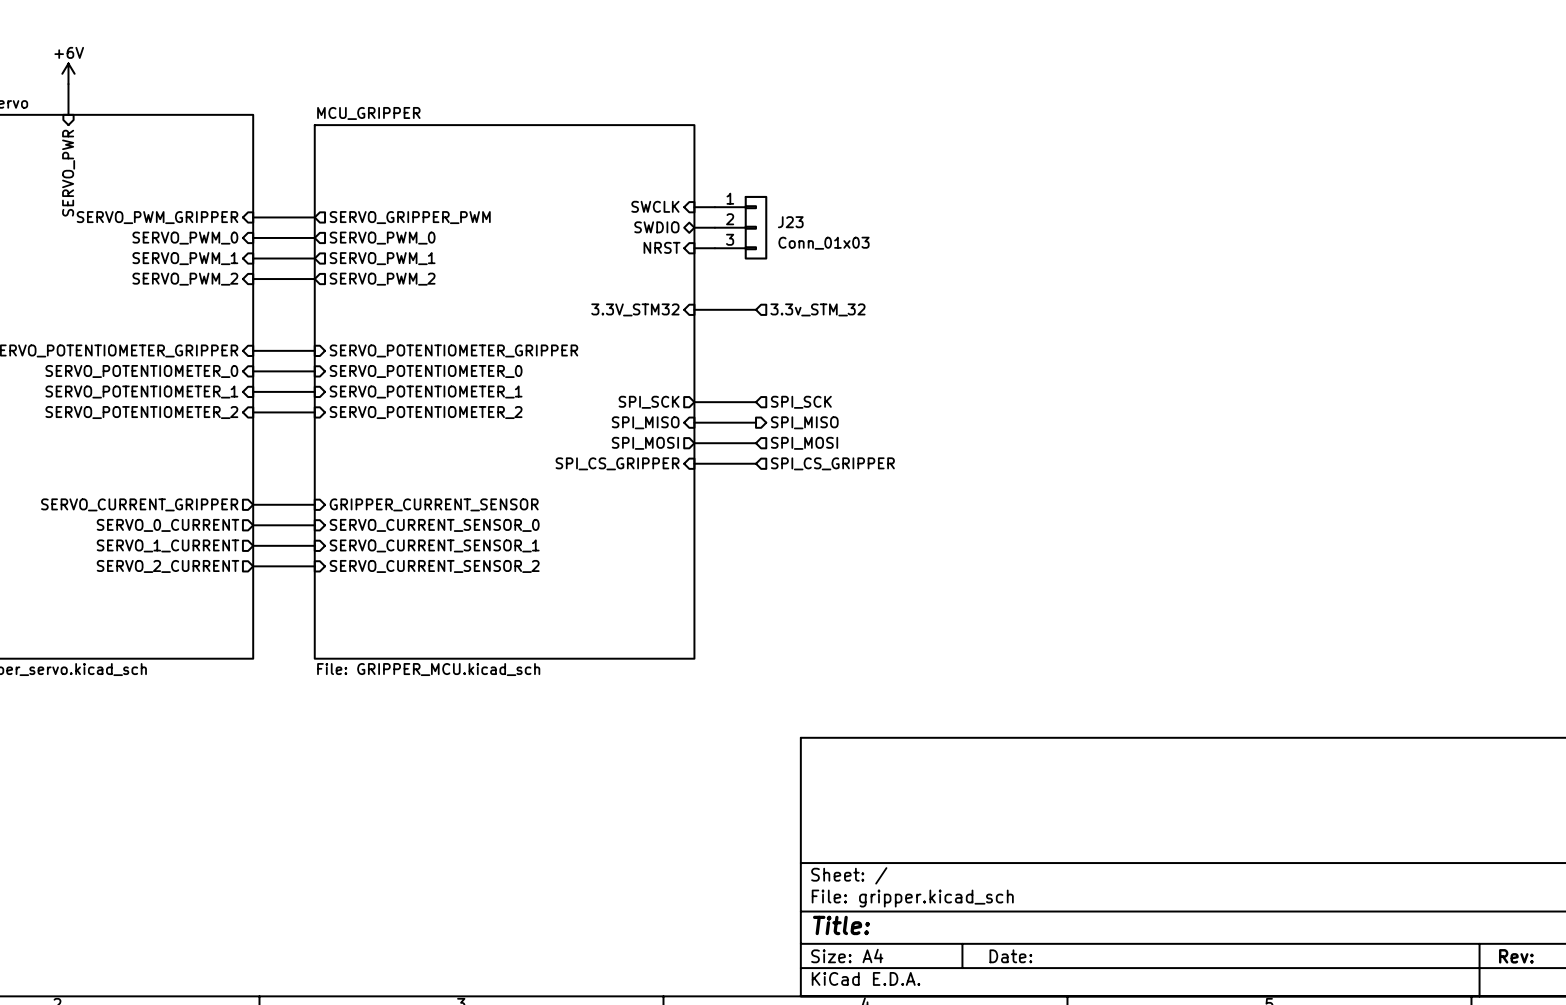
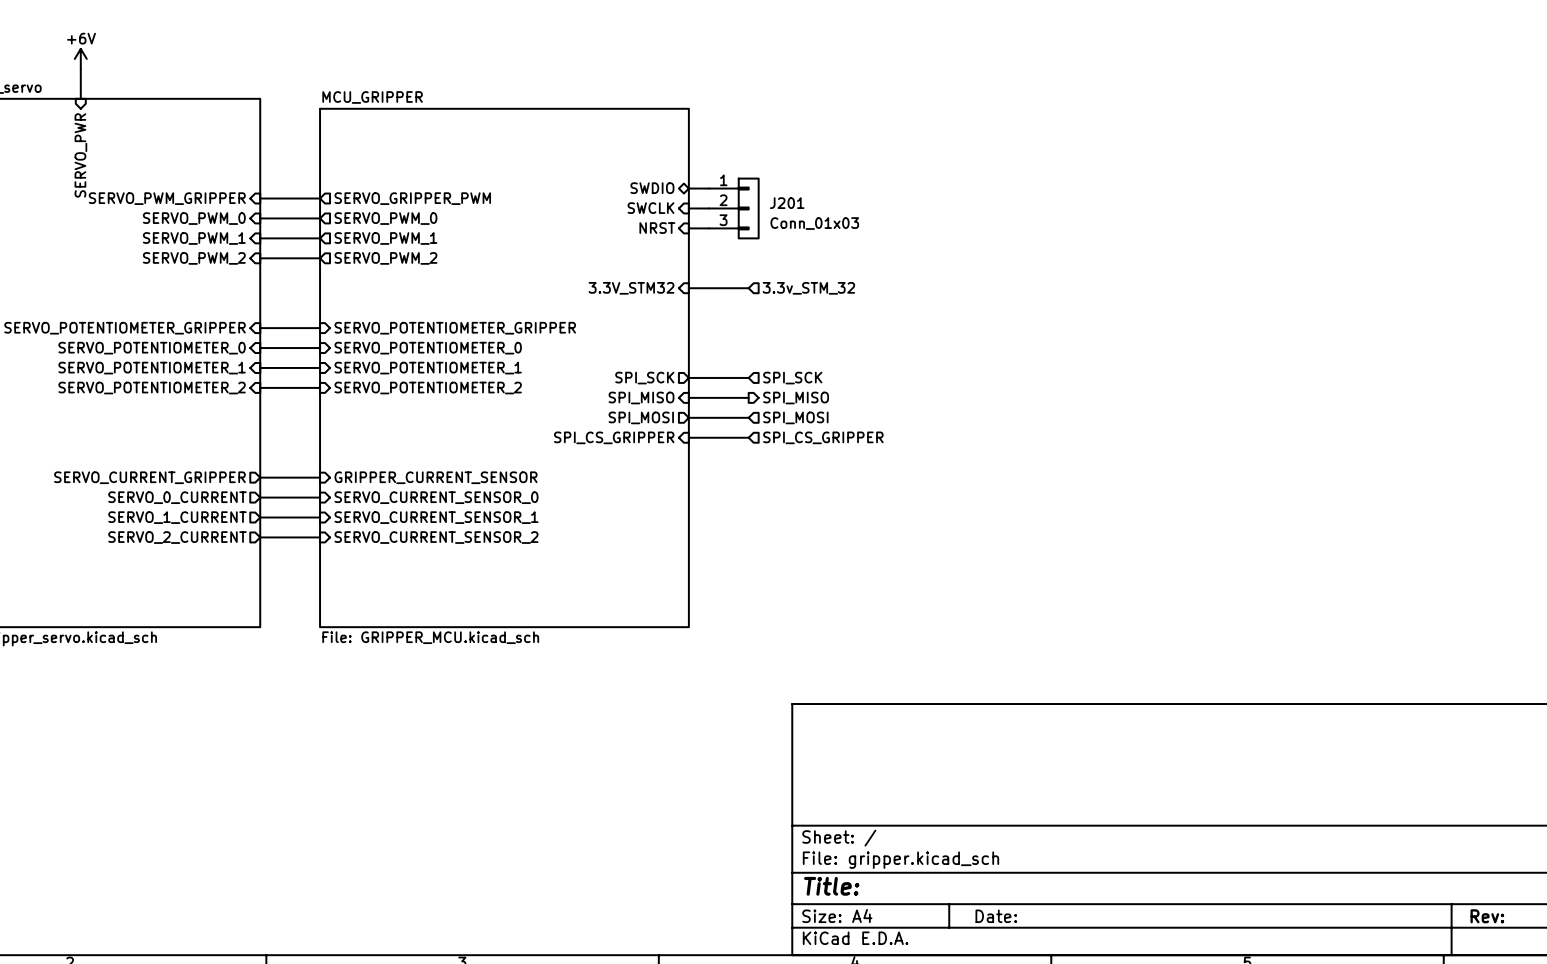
sheet pin shape: input (655, 206) -> bidirectional (652, 188)
sheet pin: SWCLK (655, 206) -> SWDIO (652, 188)
J23 name: J23 (790, 222) -> J201 (787, 203)
sheet pin shape: bidirectional (656, 227) -> input (650, 208)
sheet pin: SWDIO (656, 227) -> SWCLK (650, 208)

